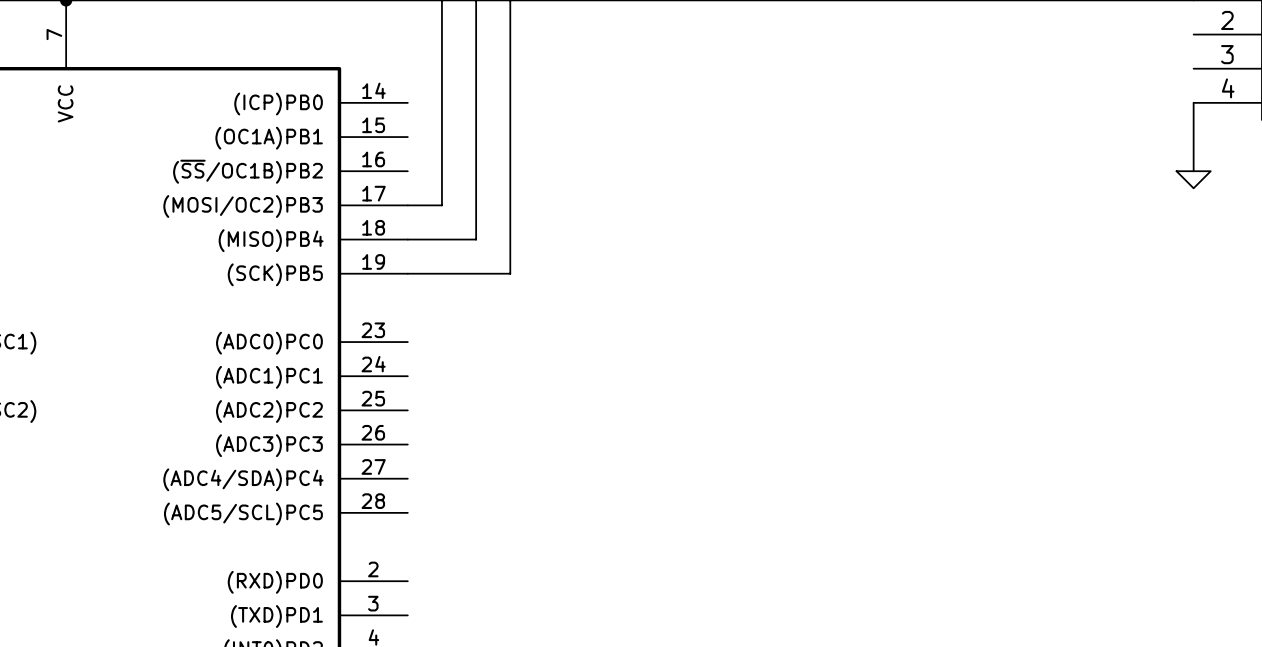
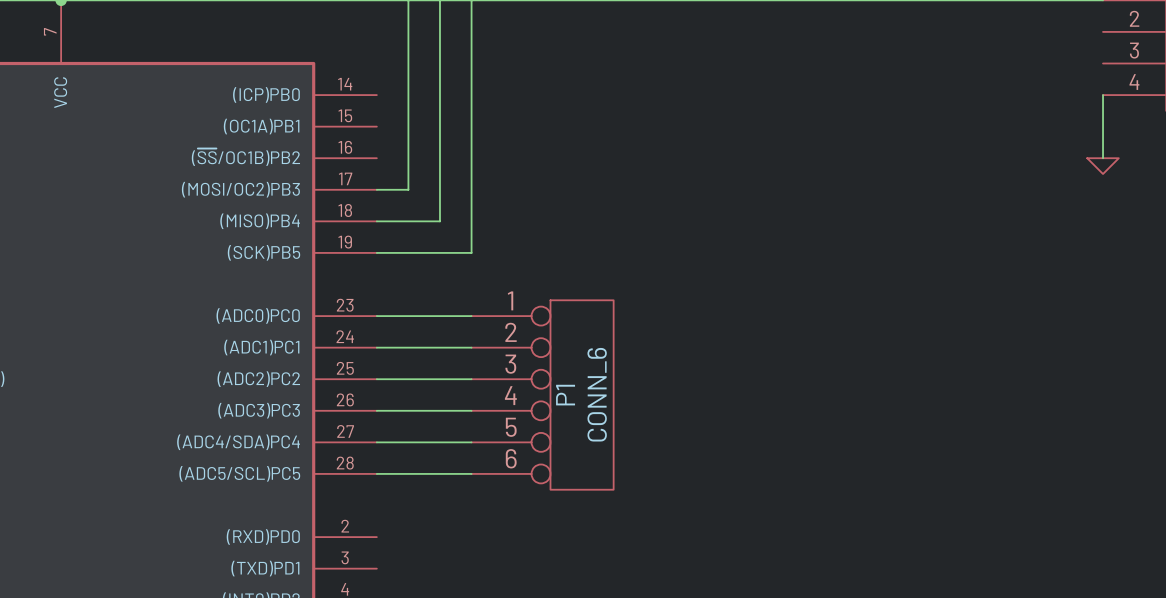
wire: none -> (376, 316) (471, 316)
wire: none -> (376, 347) (471, 347)
wire: none -> (376, 379) (471, 379)
P1: none -> CONN_6 (542, 395)
wire: none -> (376, 410) (471, 410)
wire: none -> (376, 442) (471, 442)
wire: none -> (376, 473) (471, 473)

